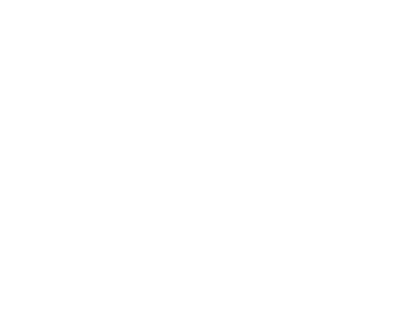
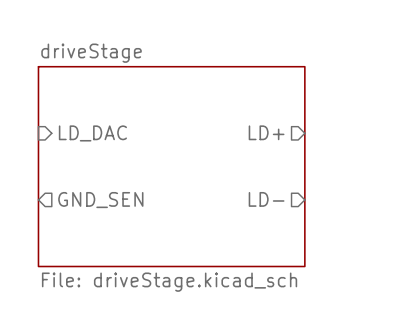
sheet pin: none -> LD+ (266, 132)
sheet pin: none -> LD_DAC (92, 133)
sheet driveStage: none -> File: driveStage.kicad_sch (171, 166)
sheet pin: none -> LD- (266, 199)
sheet pin: none -> GND_SEN (100, 200)

